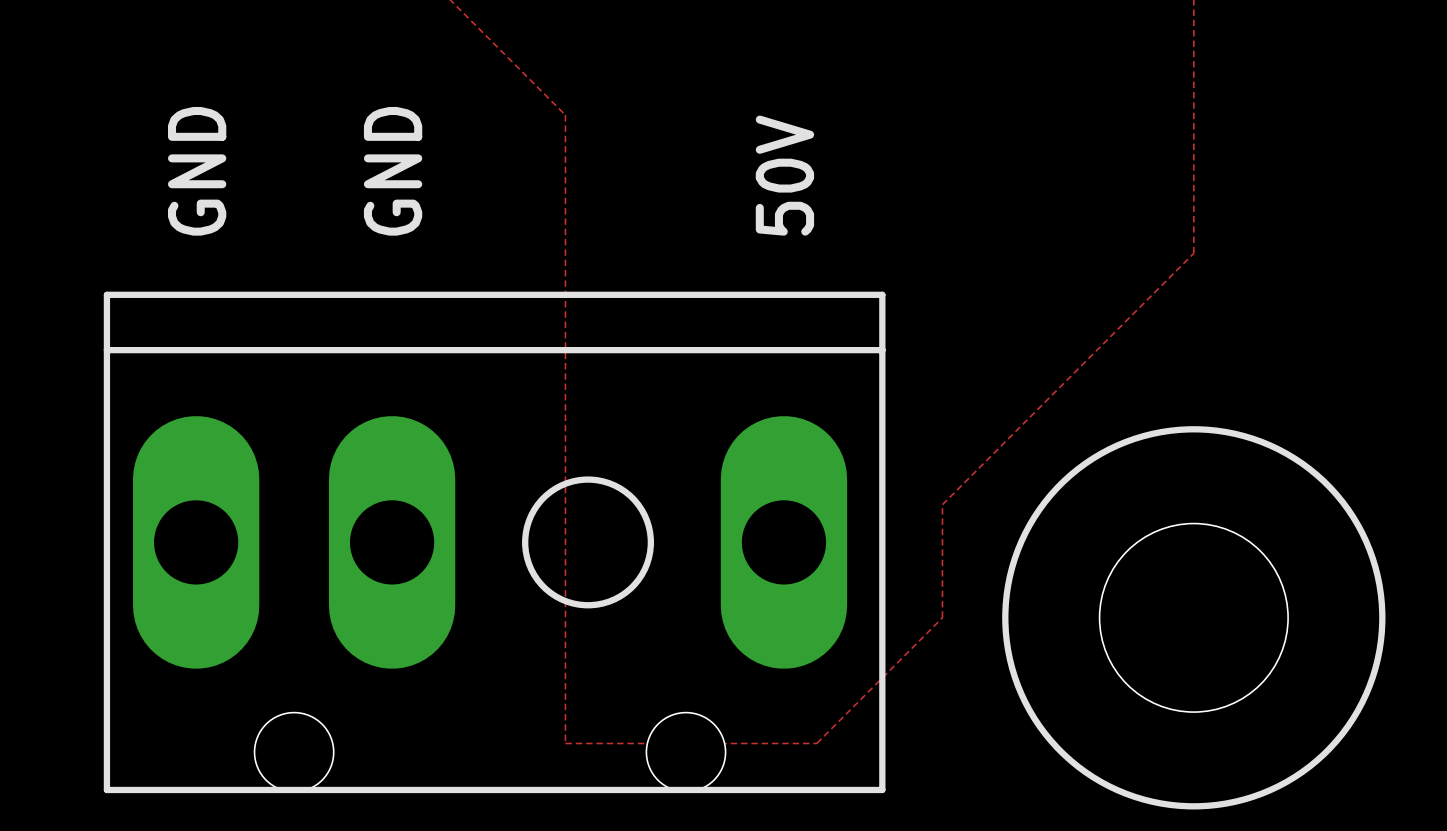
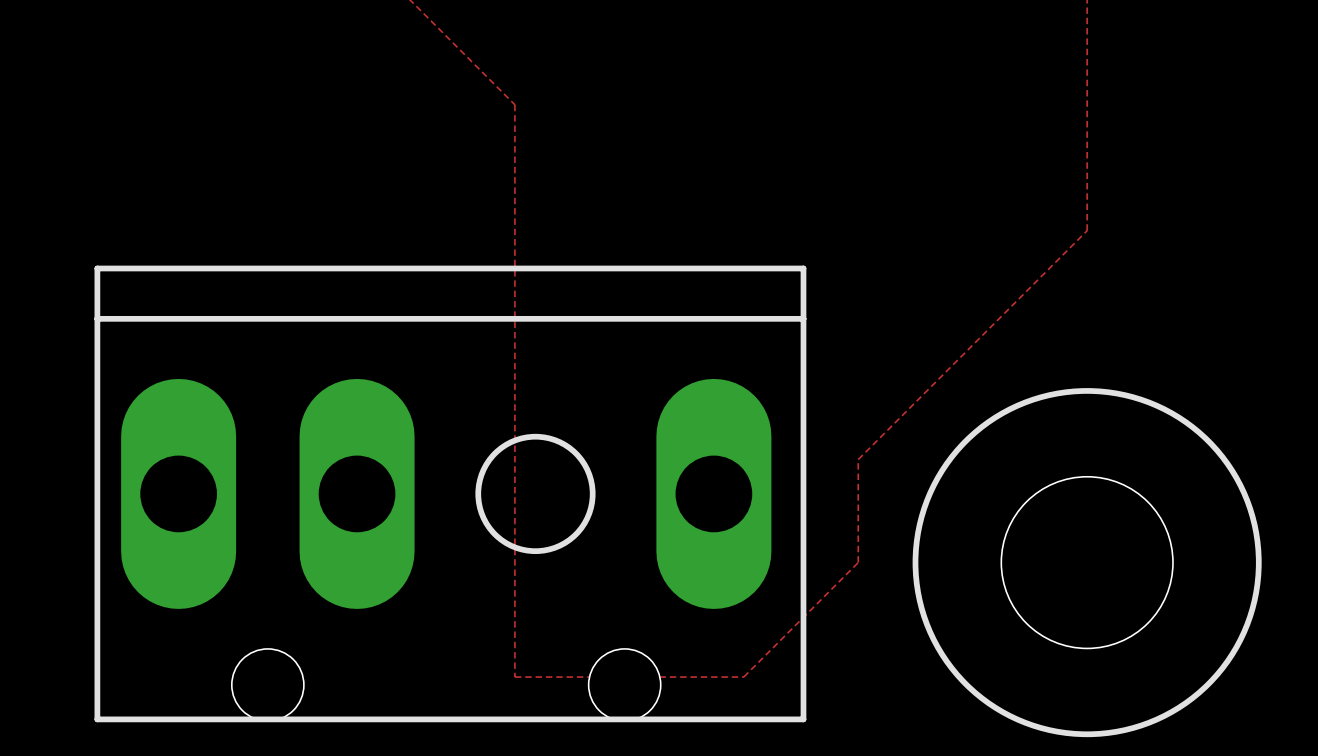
part text: GND (197, 171) -> none
part text: GND (393, 171) -> none
part text: 50V (784, 175) -> none

